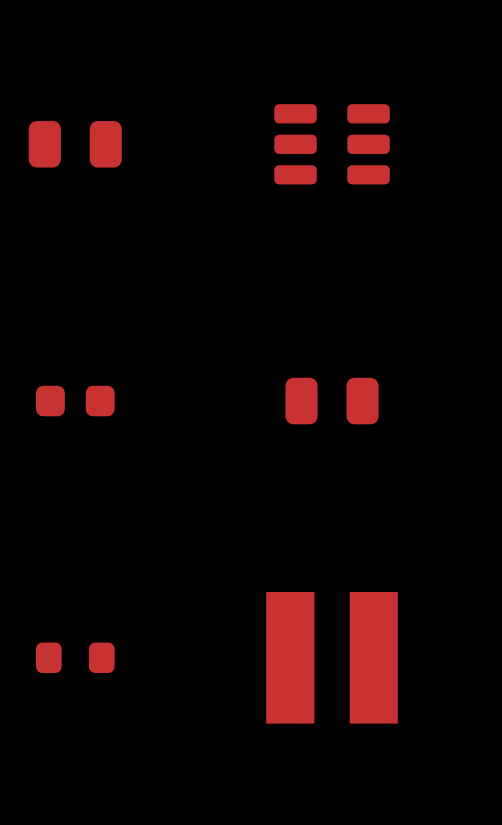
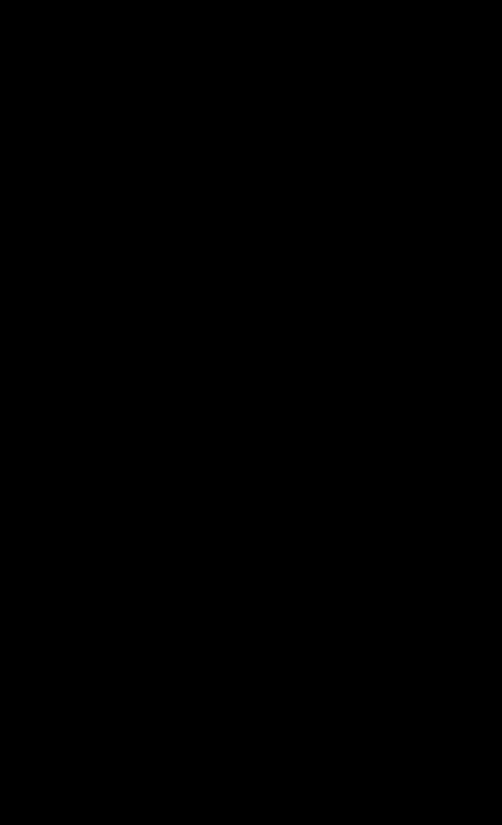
part: (75, 144) -> none
part: (332, 144) -> none
part: (75, 401) -> none
part: (332, 401) -> none
part: (75, 657) -> none
part: (332, 657) -> none

